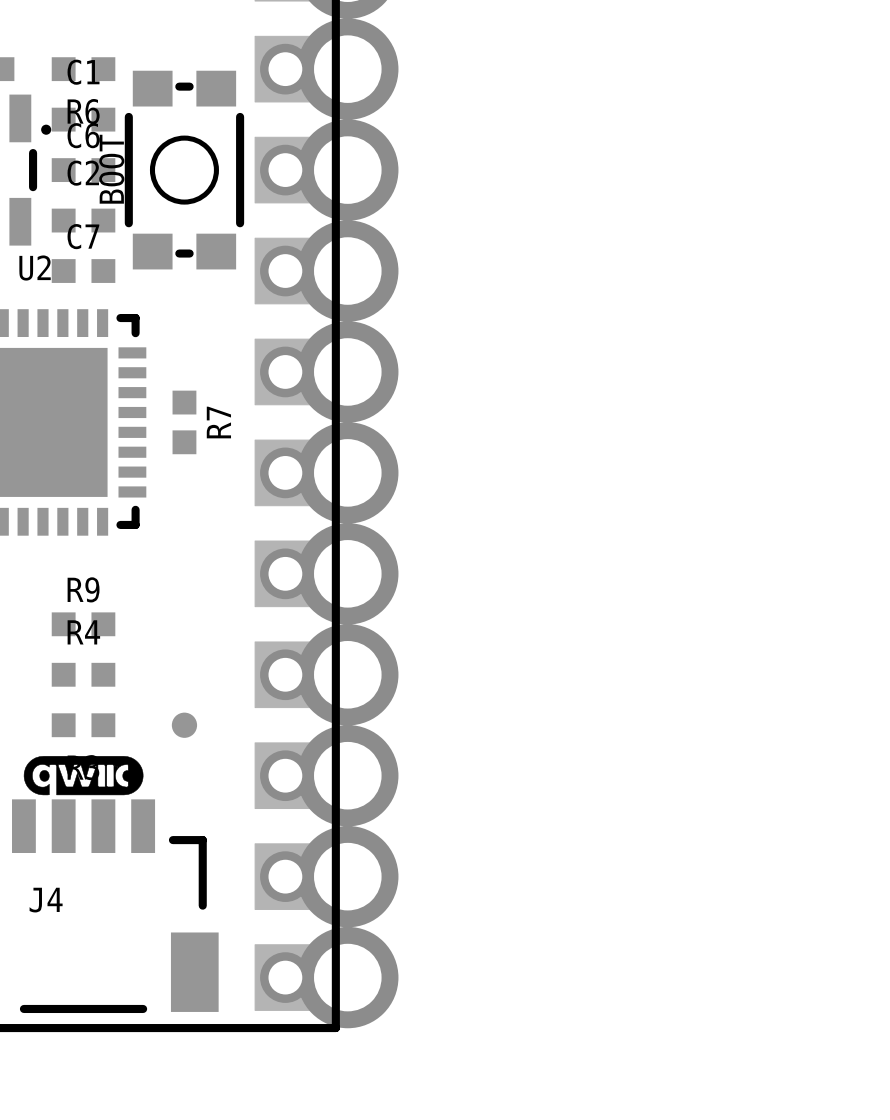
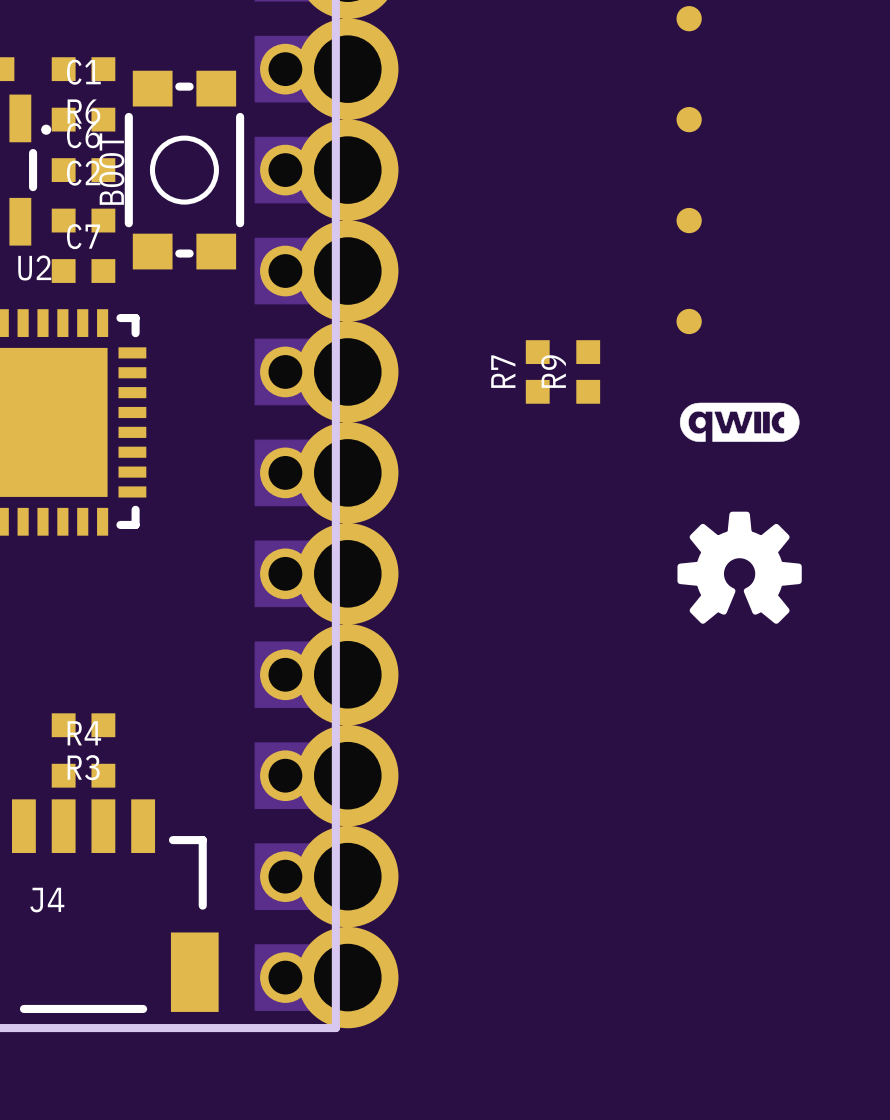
part: none -> (689, 18)
part: none -> (689, 119)
part: none -> (689, 220)
part: none -> (689, 321)
R7 position: (184, 422) -> (537, 371)
R7 name position: R7 (218, 422) -> R7 (503, 371)
drawing: none -> [677, 511, 802, 624]
R9 rotation: 0° (83, 624) -> 90° clockwise (588, 371)
R9 position: (83, 624) -> (588, 371)
R4 position: (83, 674) -> (83, 775)
part: (184, 725) -> none
drawing position: (83, 775) -> (739, 422)

